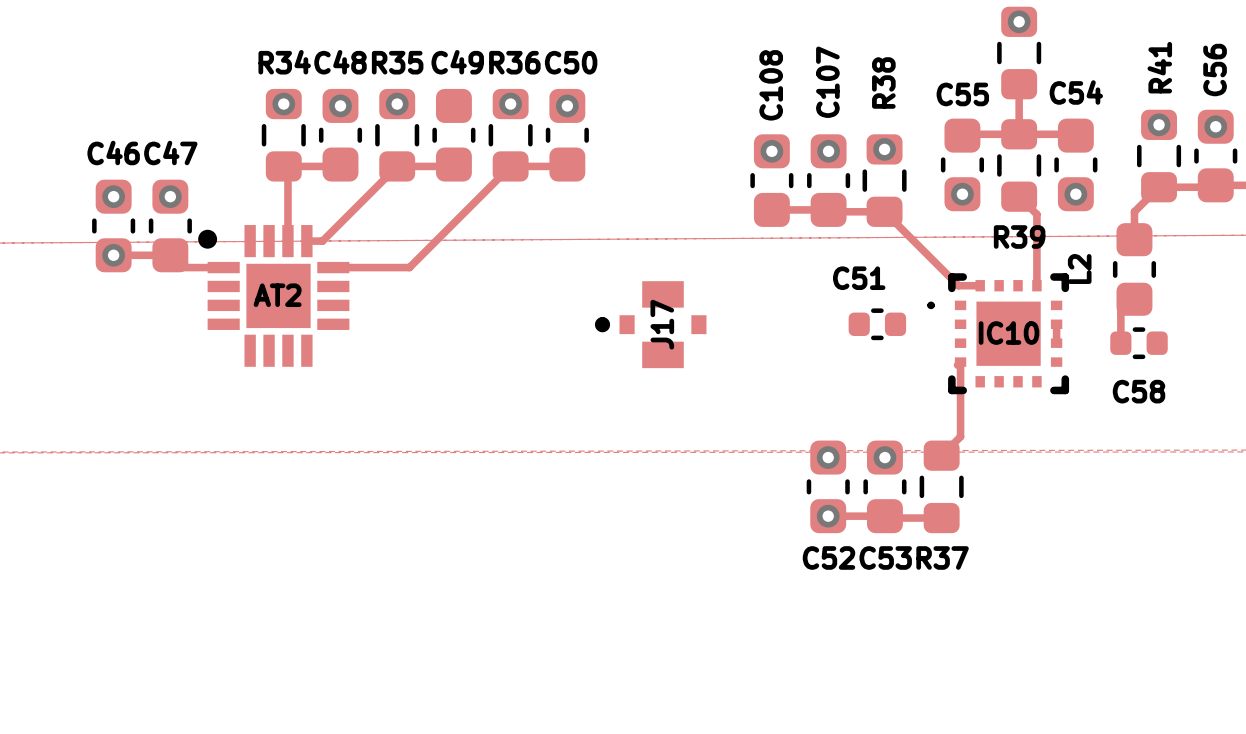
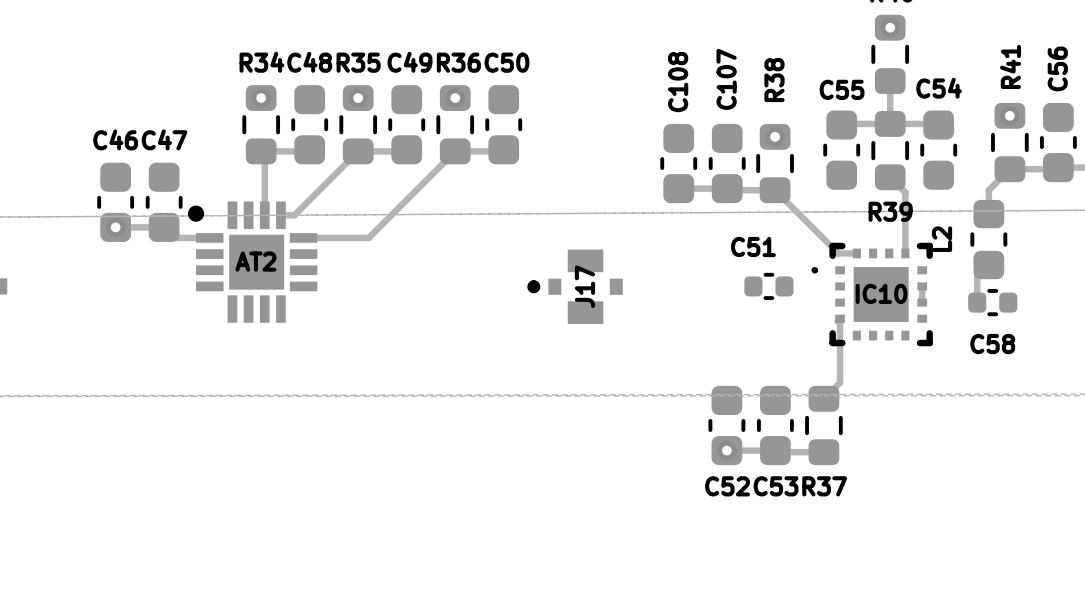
via: (340, 105) -> none
via: (567, 105) -> none
via: (1215, 126) -> none
via: (771, 151) -> none
via: (828, 151) -> none
via: (962, 194) -> none
via: (1075, 194) -> none
via: (113, 196) -> none
via: (170, 196) -> none
via: (828, 457) -> none
via: (884, 457) -> none

